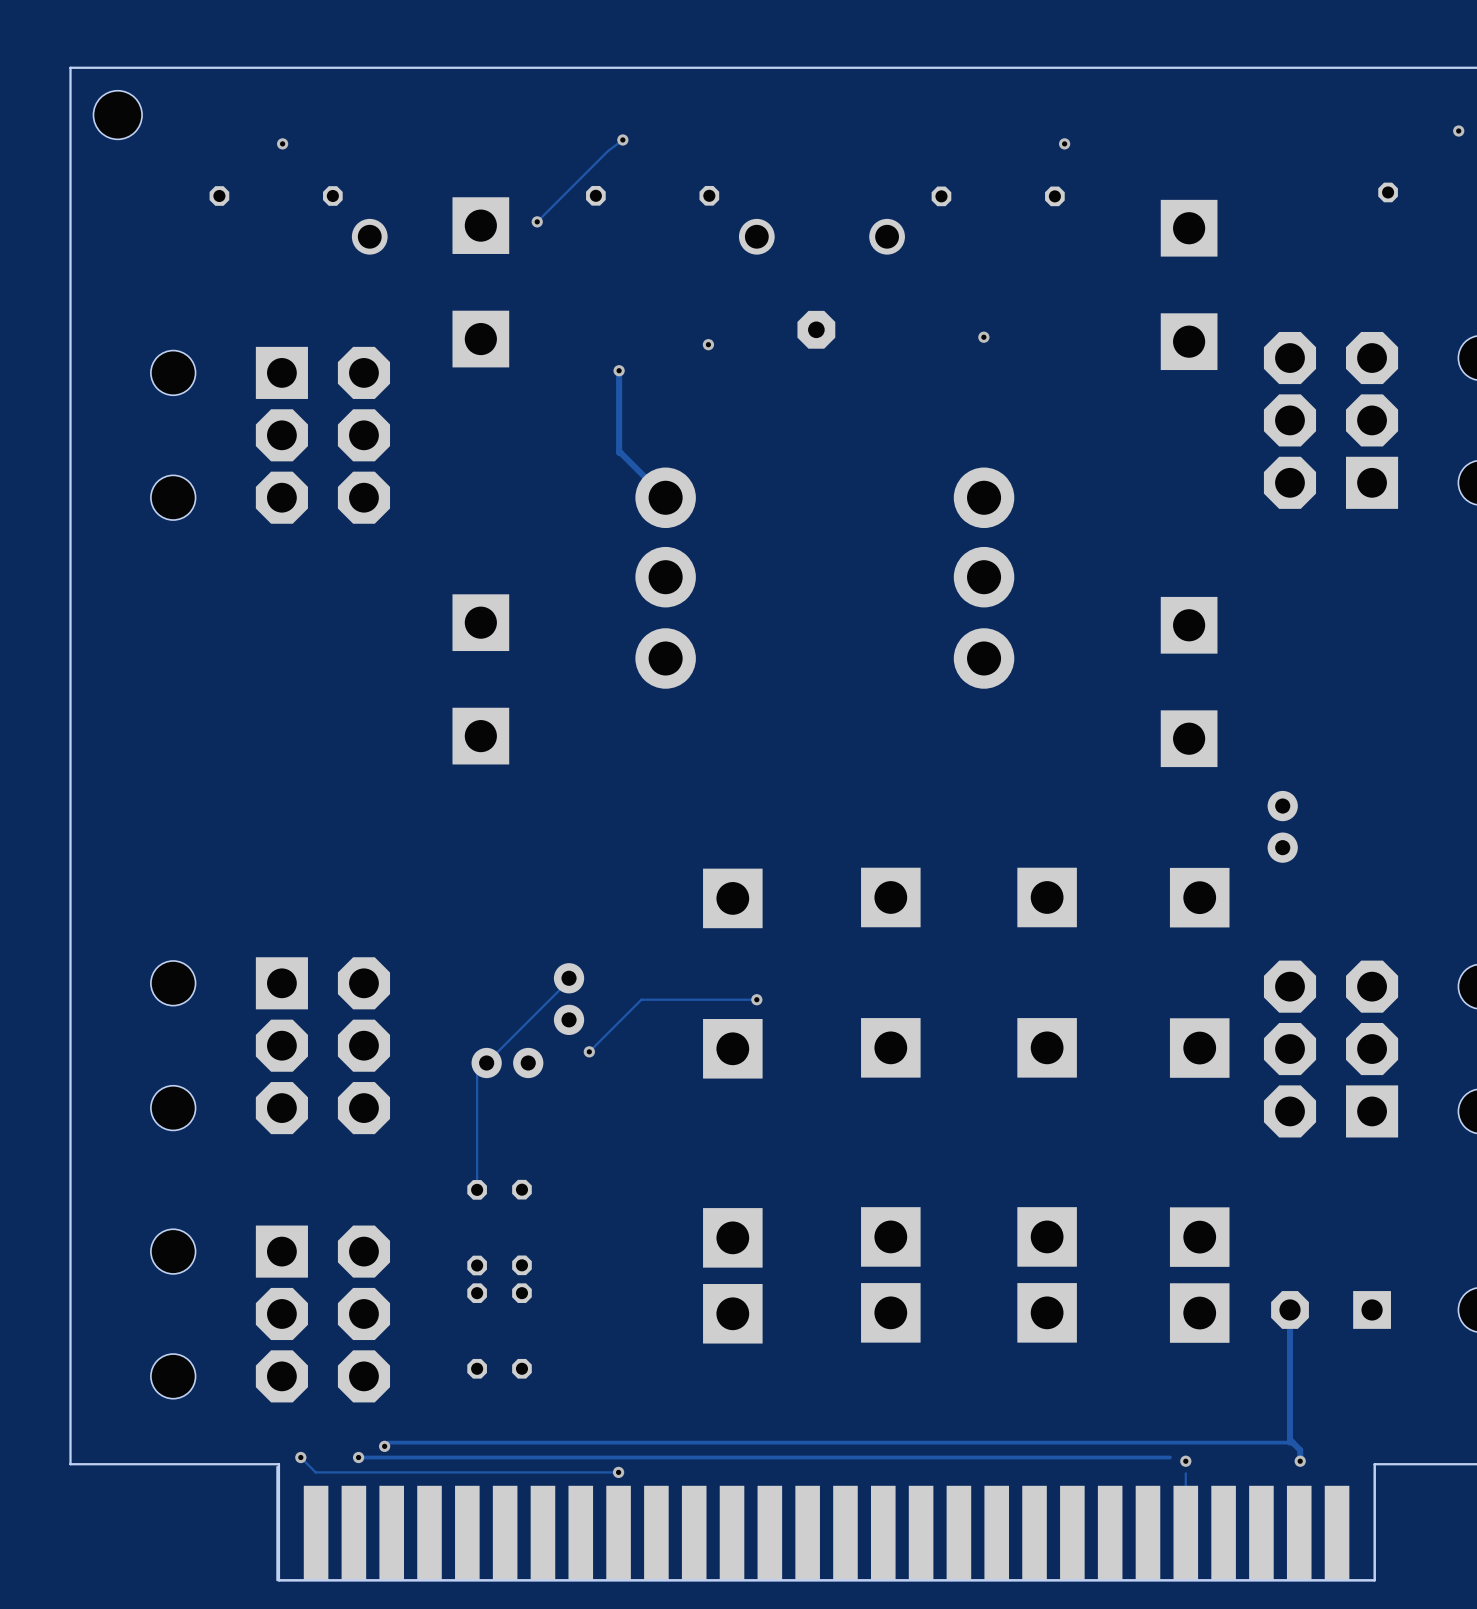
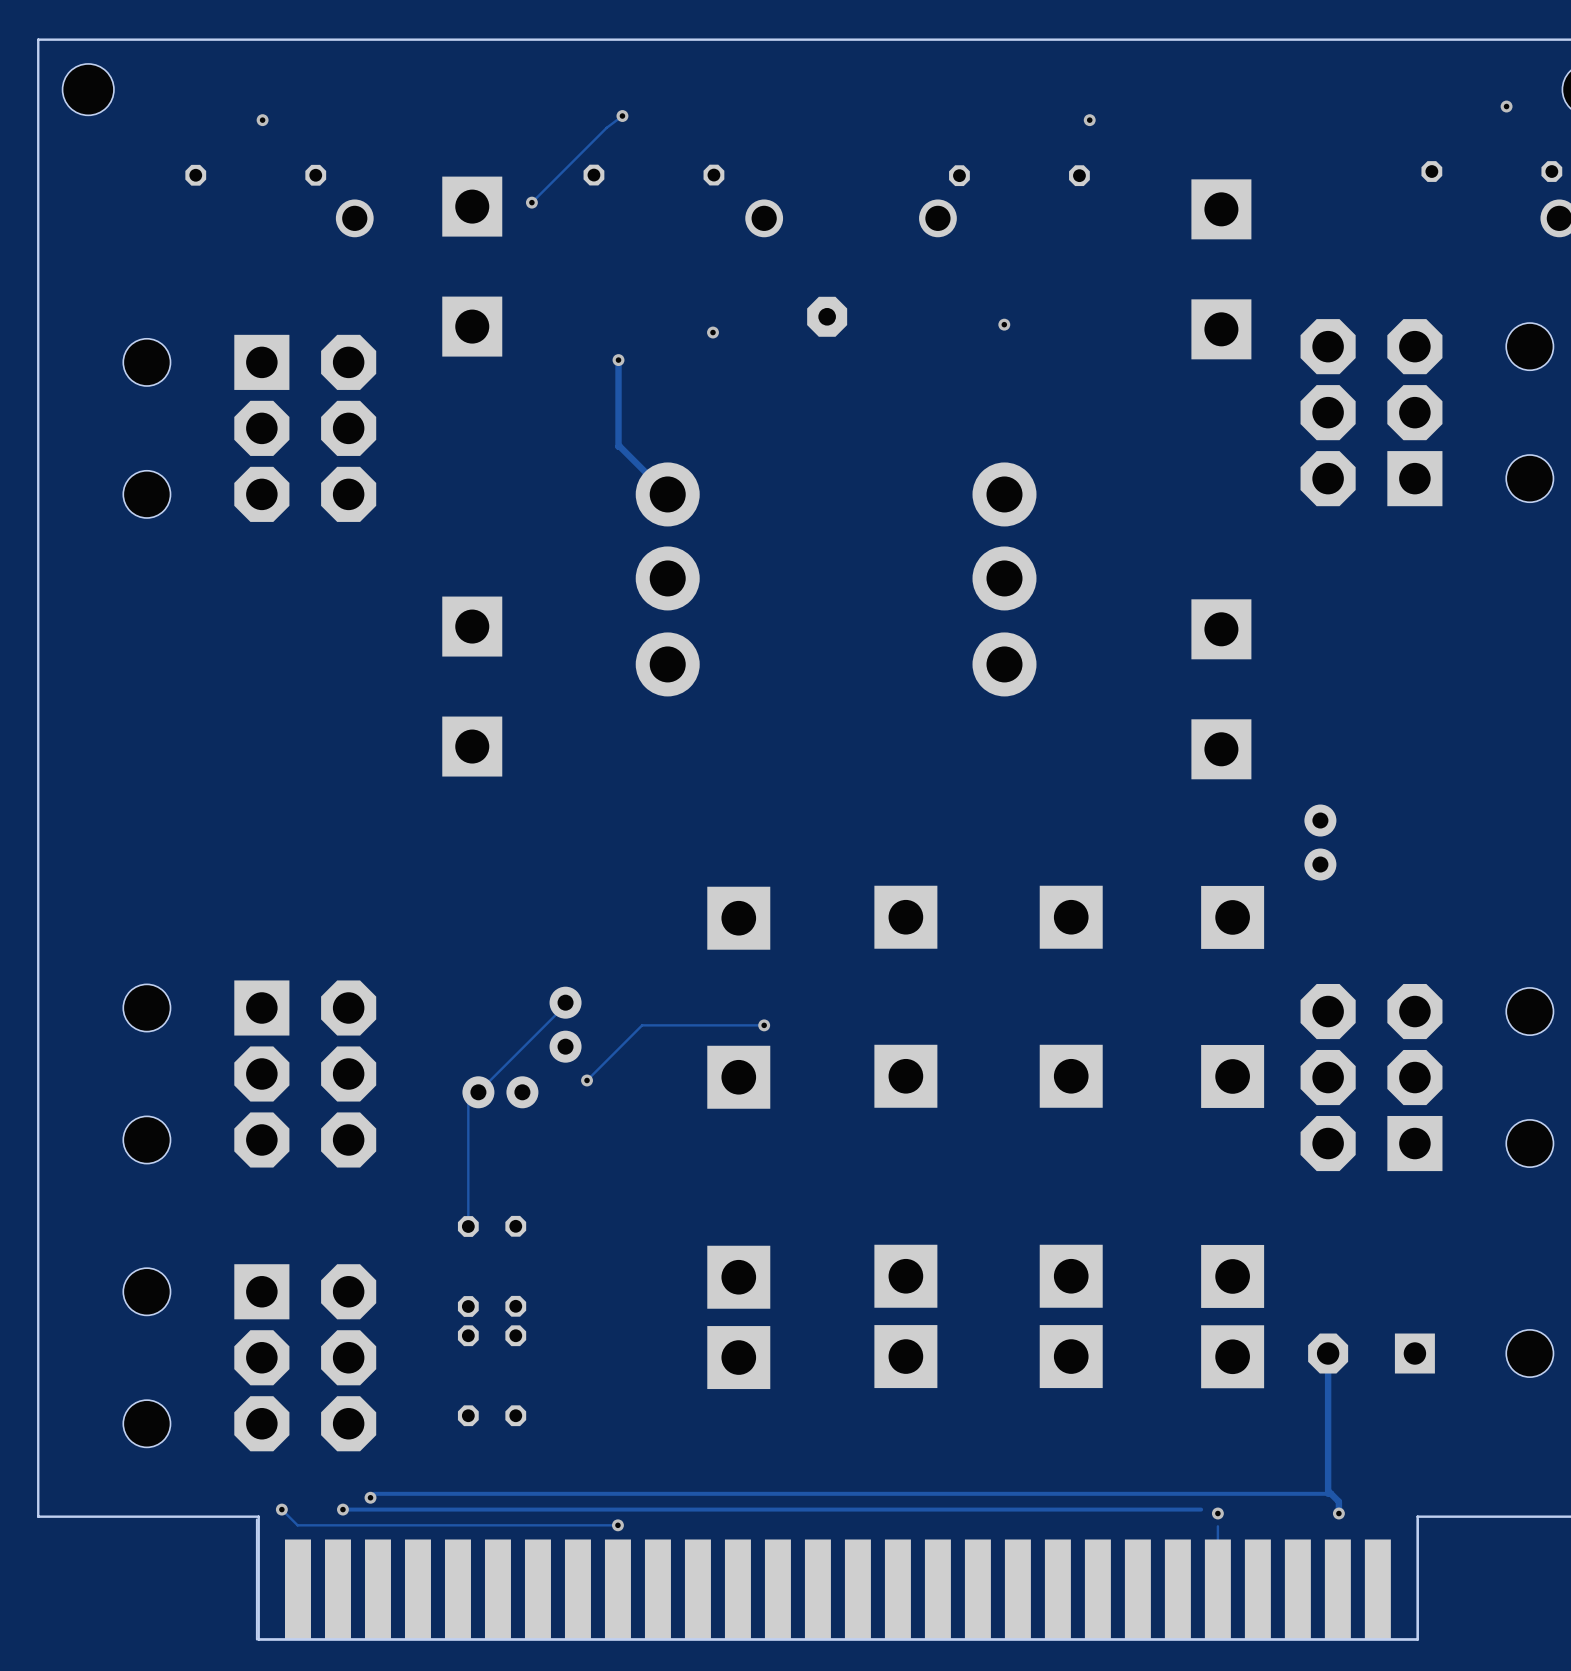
part position: (887, 236) -> (937, 218)

